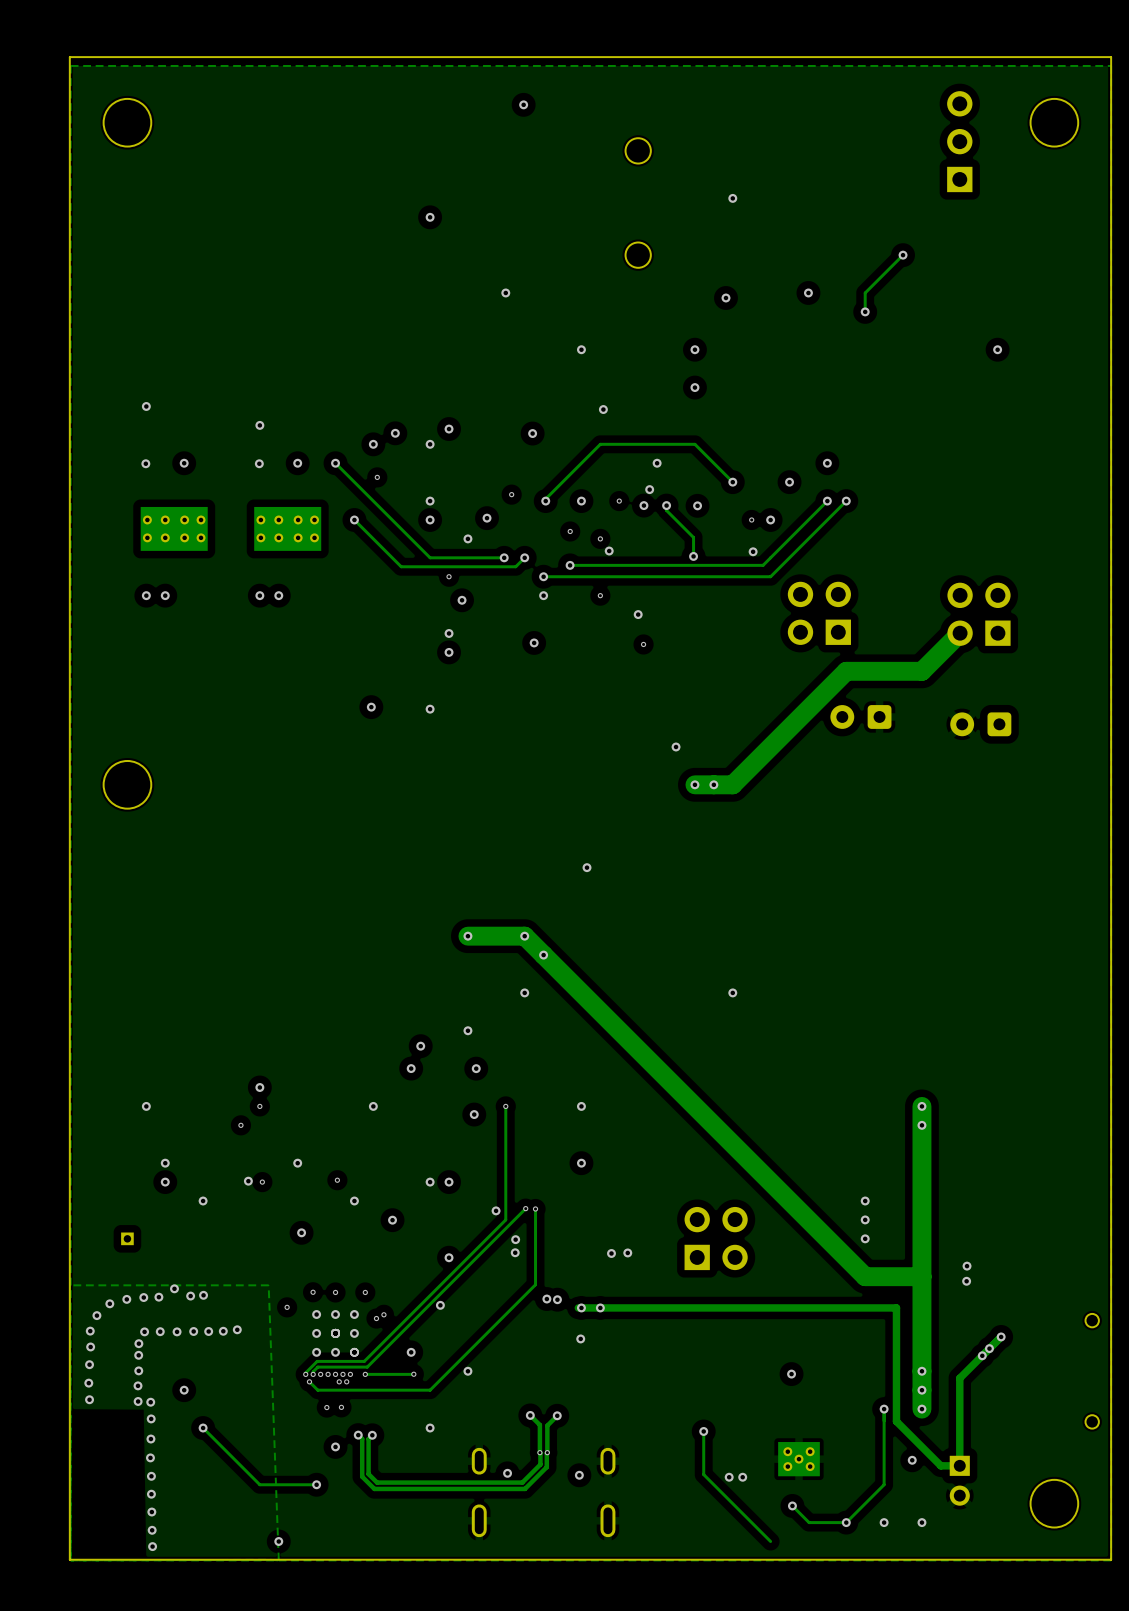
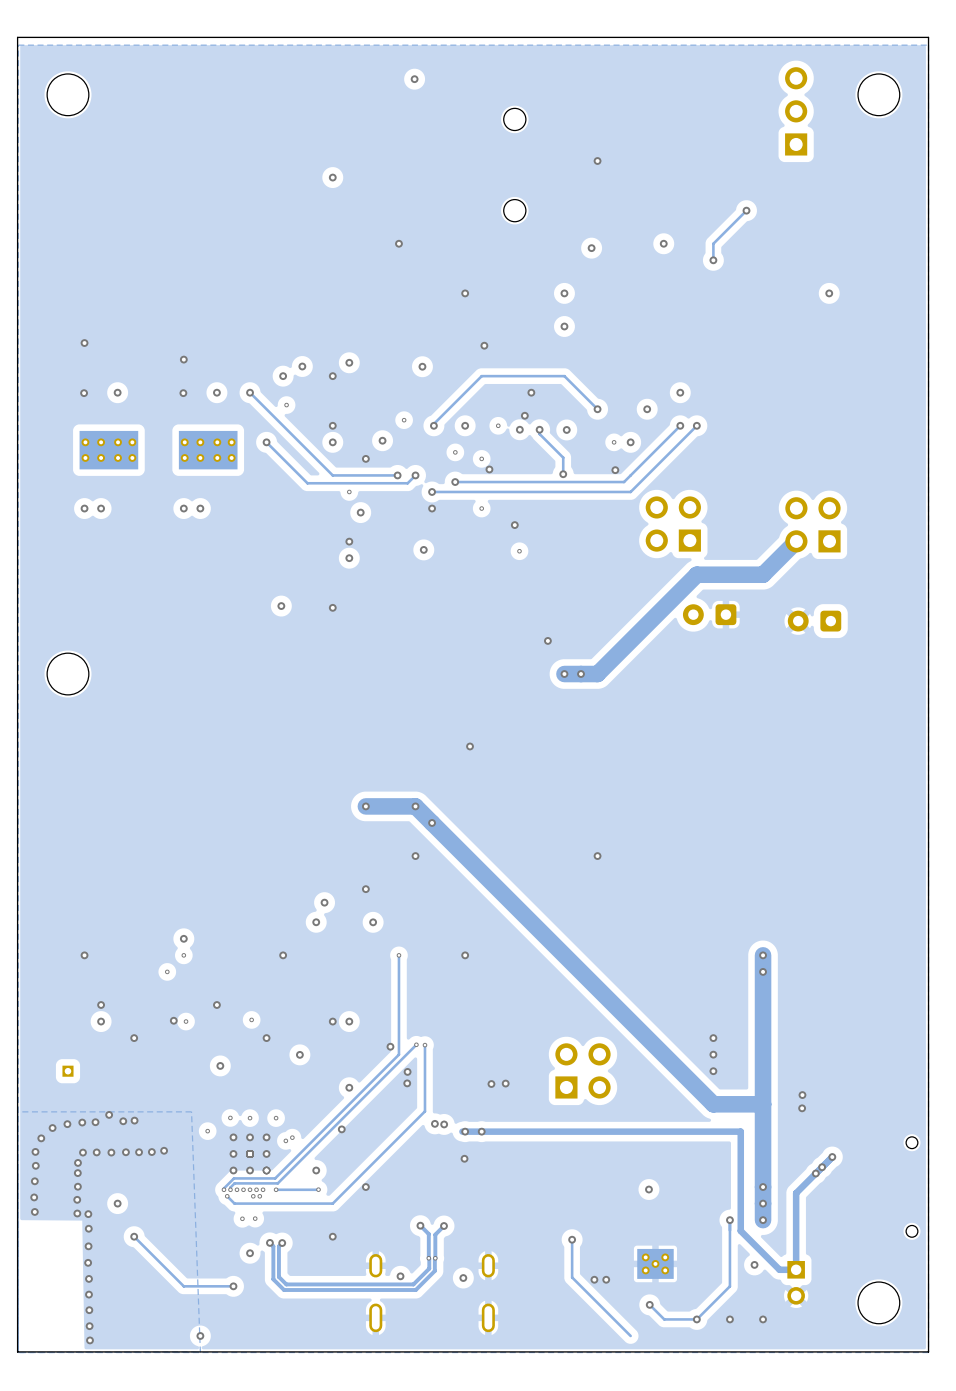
via: (474, 1114) -> none
via: (581, 1163) -> none

